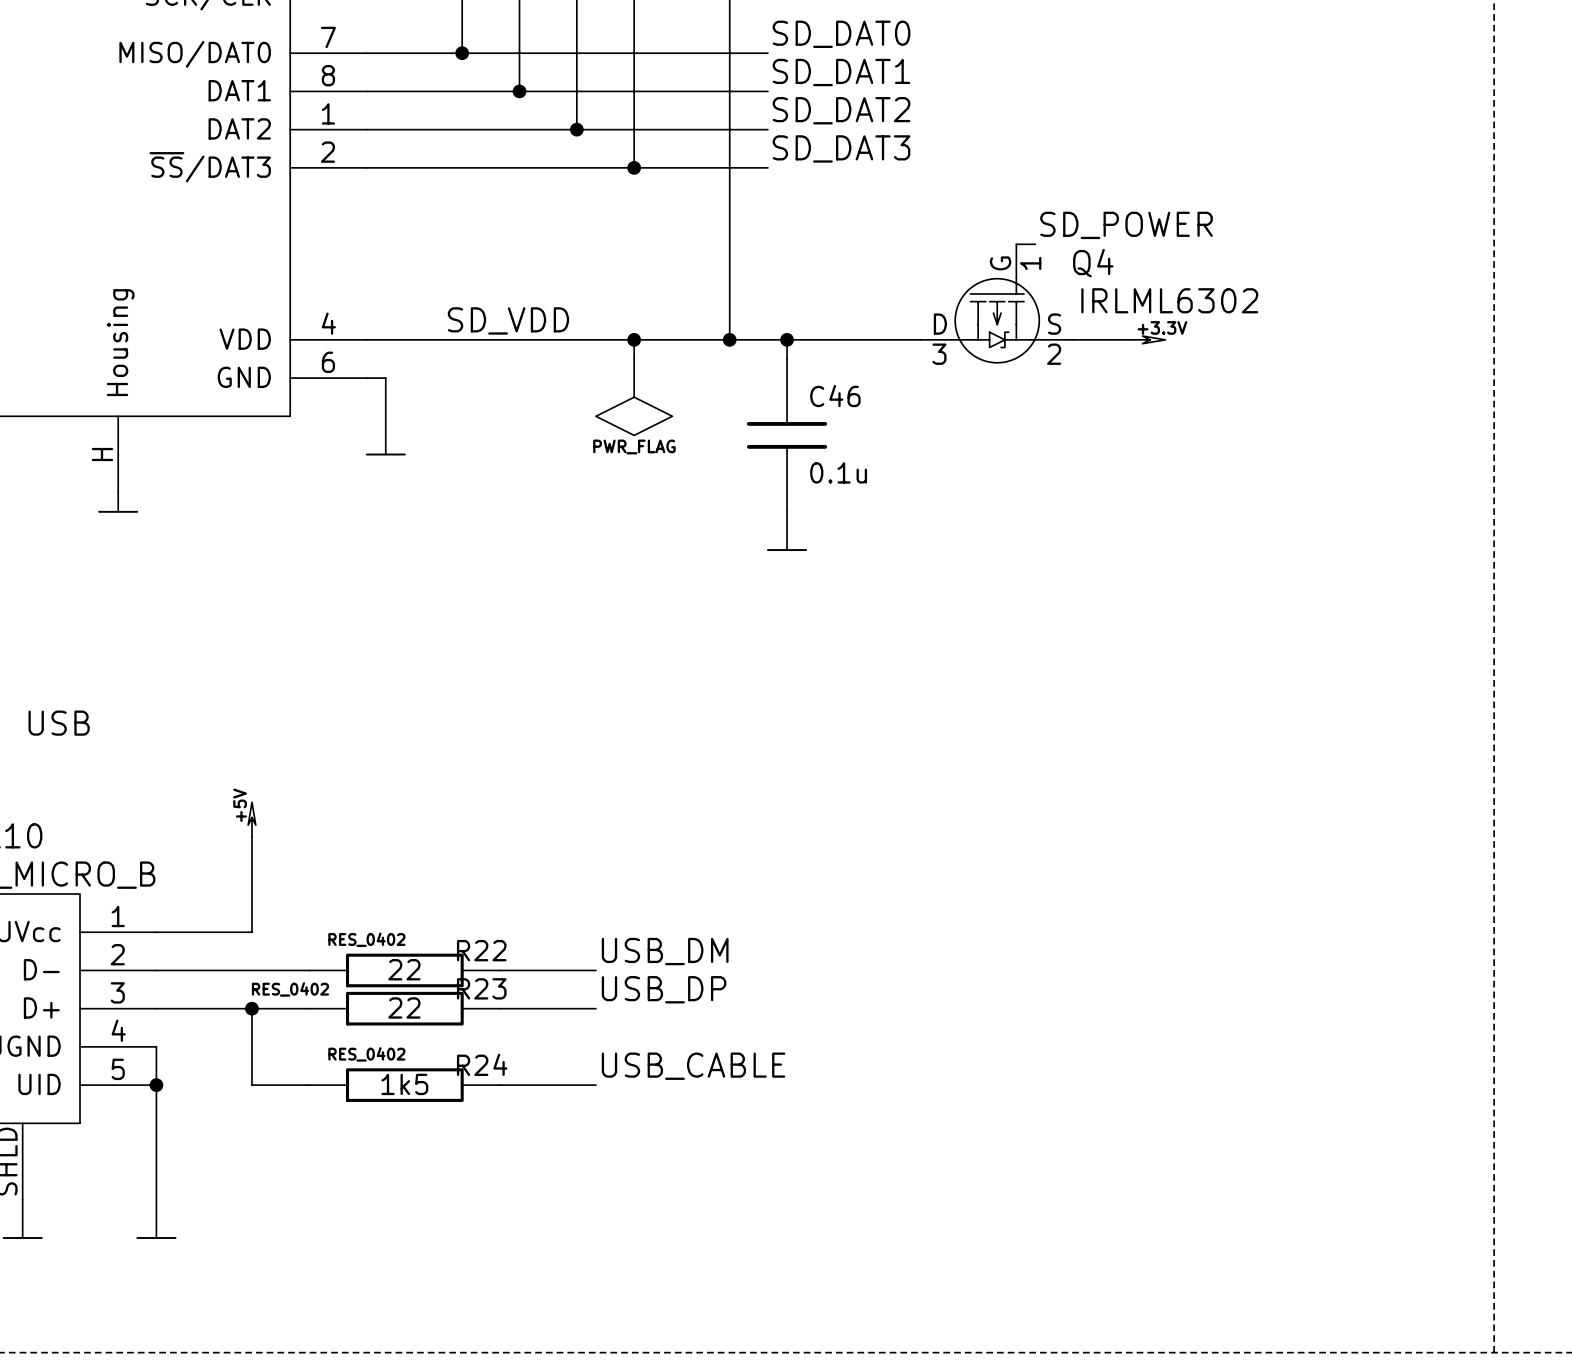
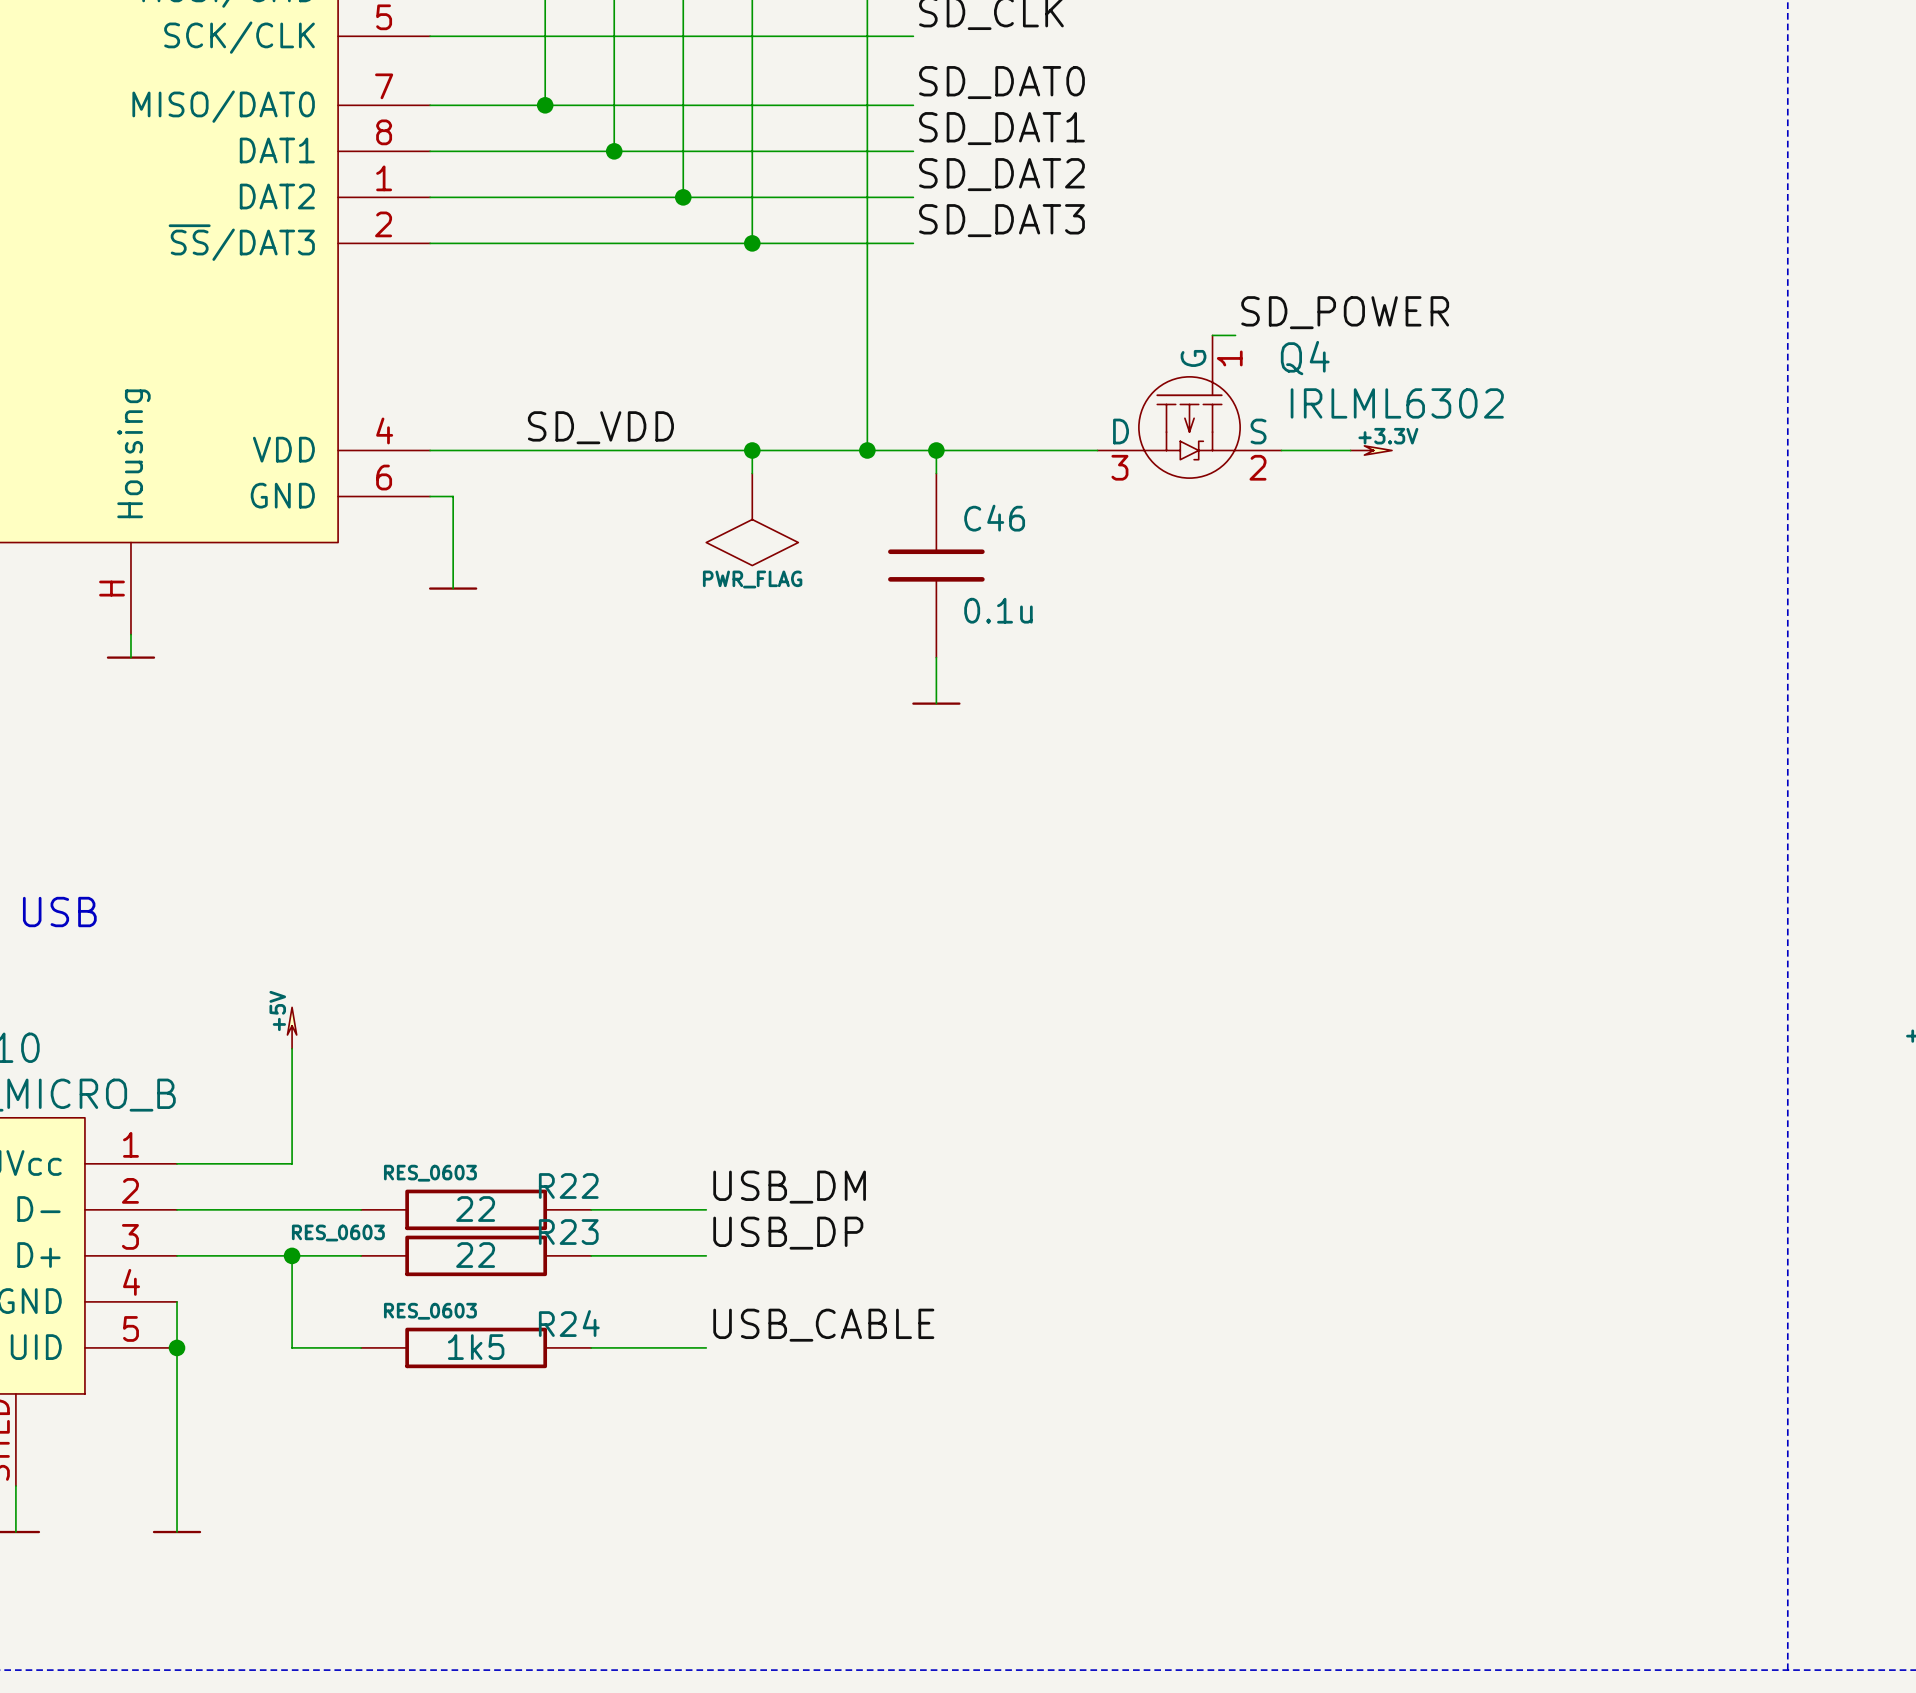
R22 text: RES_0402 (366, 939) -> RES_0603 (430, 1173)
R23 text: RES_0402 (290, 989) -> RES_0603 (338, 1233)
R24 text: RES_0402 (366, 1054) -> RES_0603 (430, 1311)

